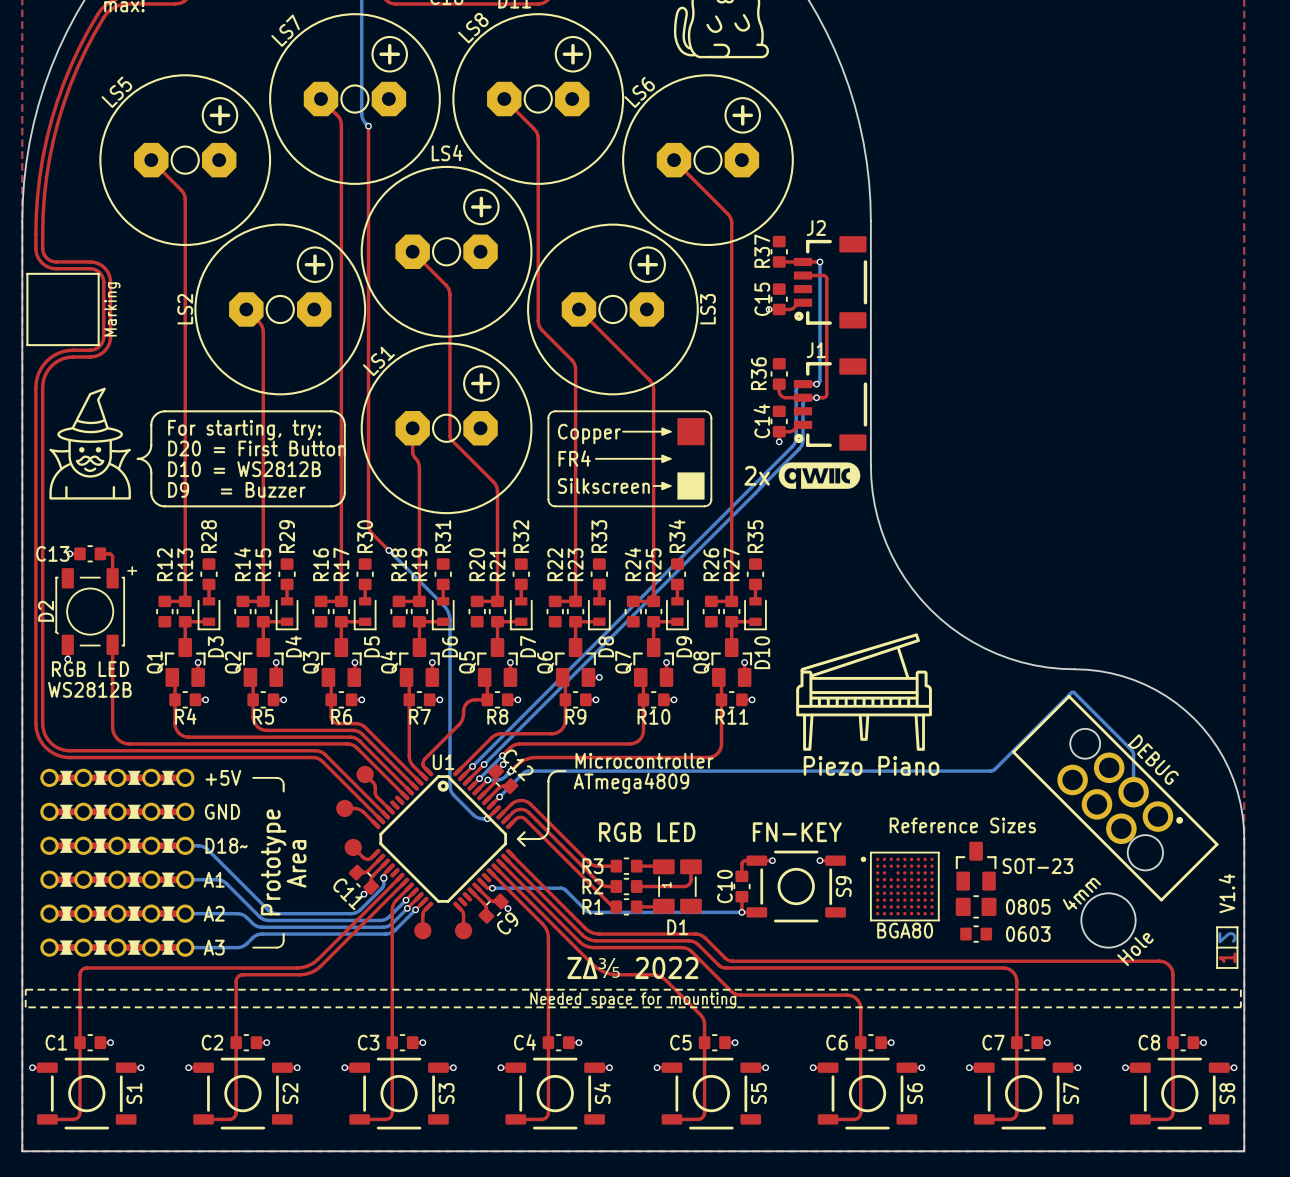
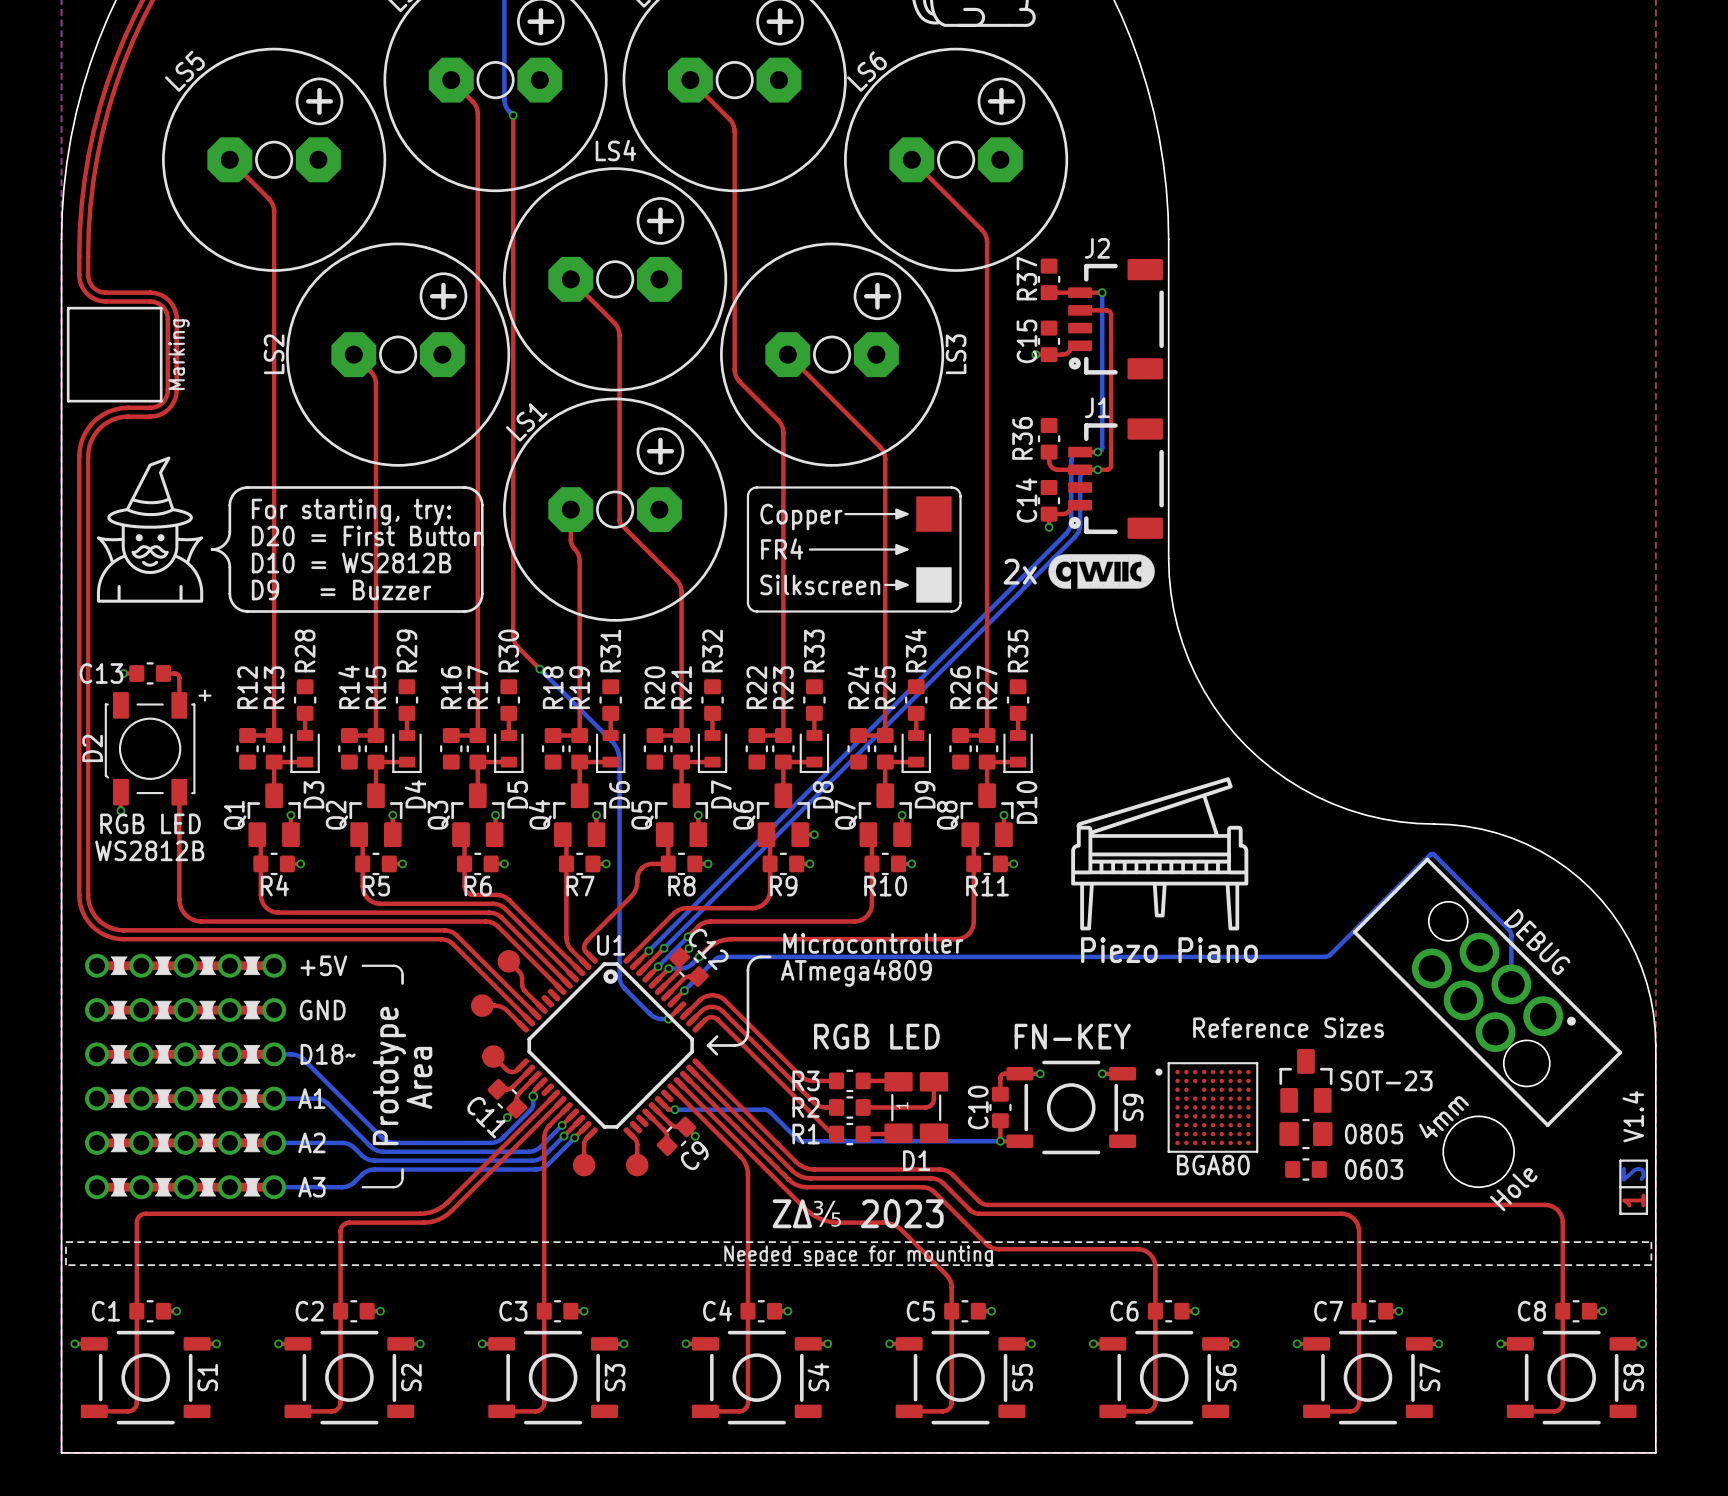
text: ZΔ⅗ 2022 (632, 967) -> ZΔ⅗ 2023 (858, 1213)

